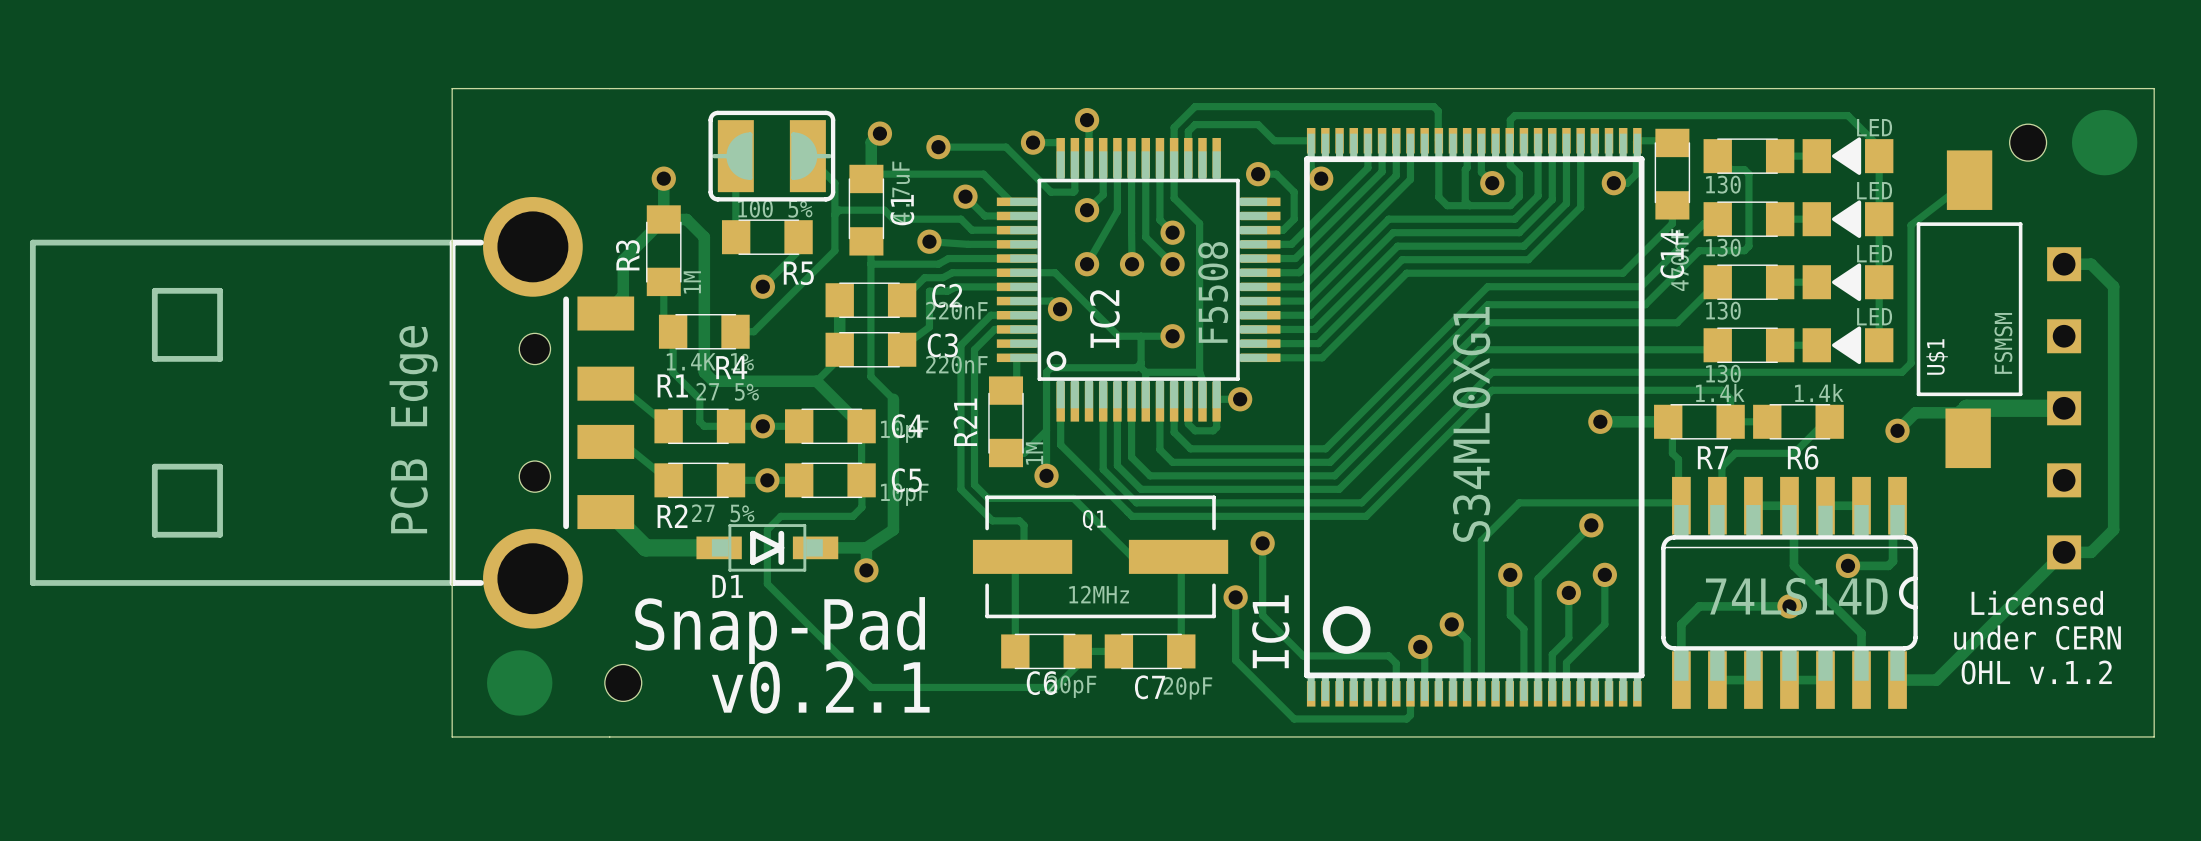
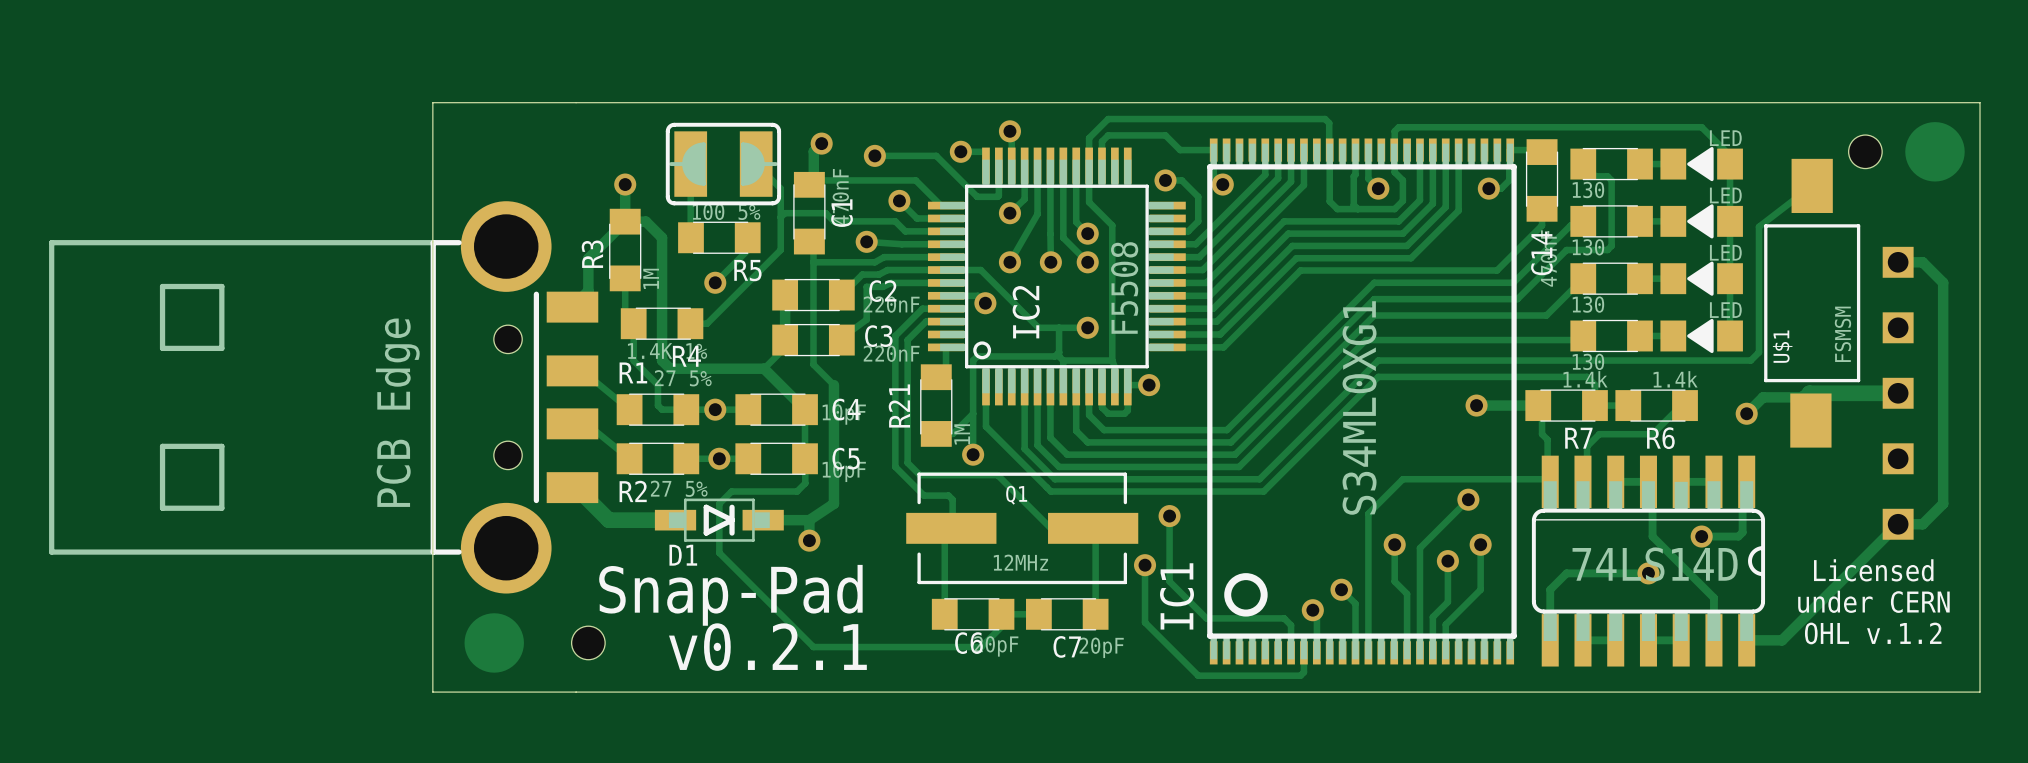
C1 value: 4.7uF (901, 192) -> 470nF (840, 197)

